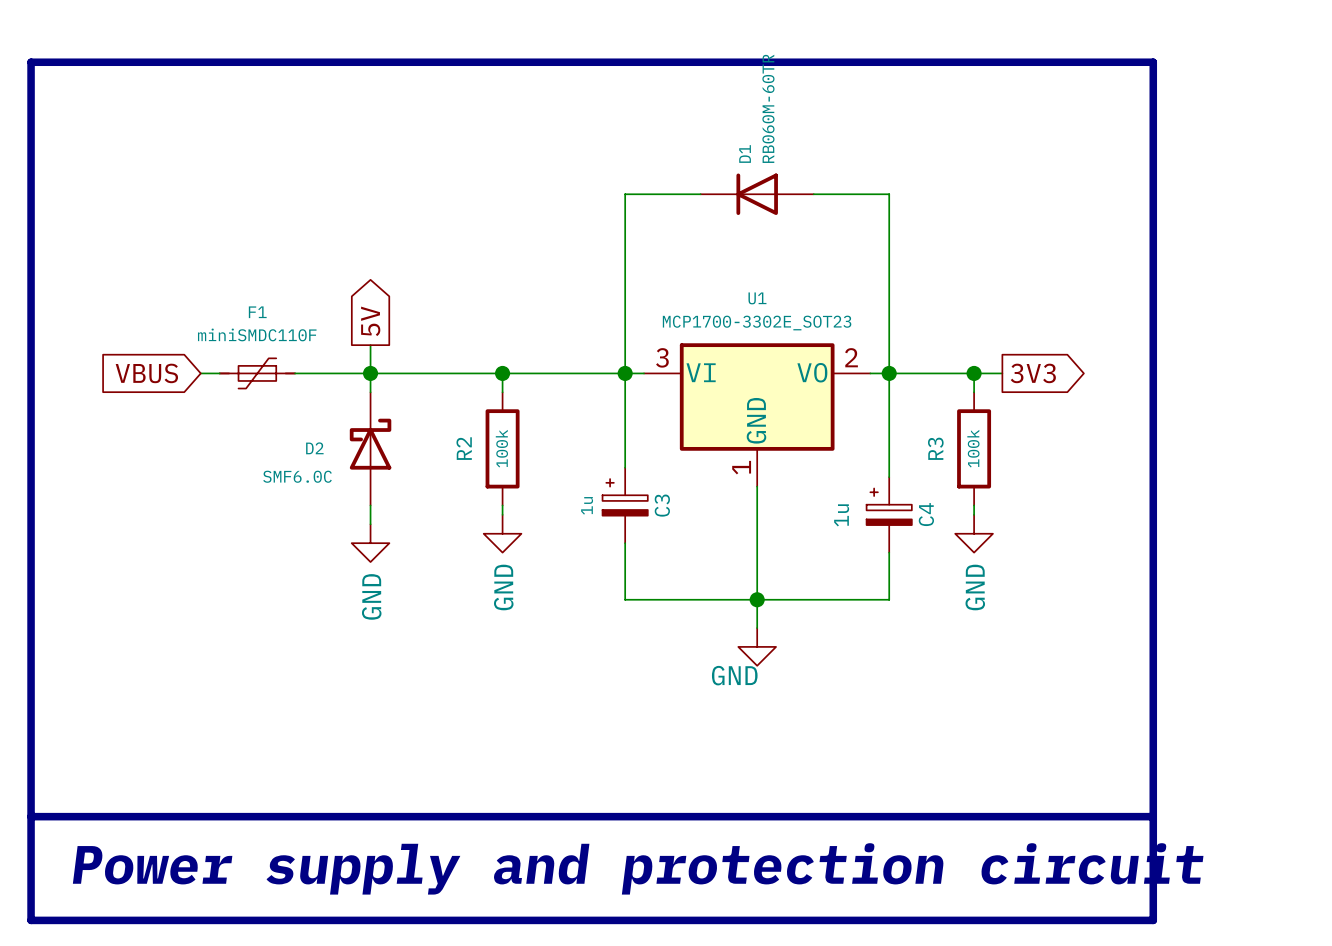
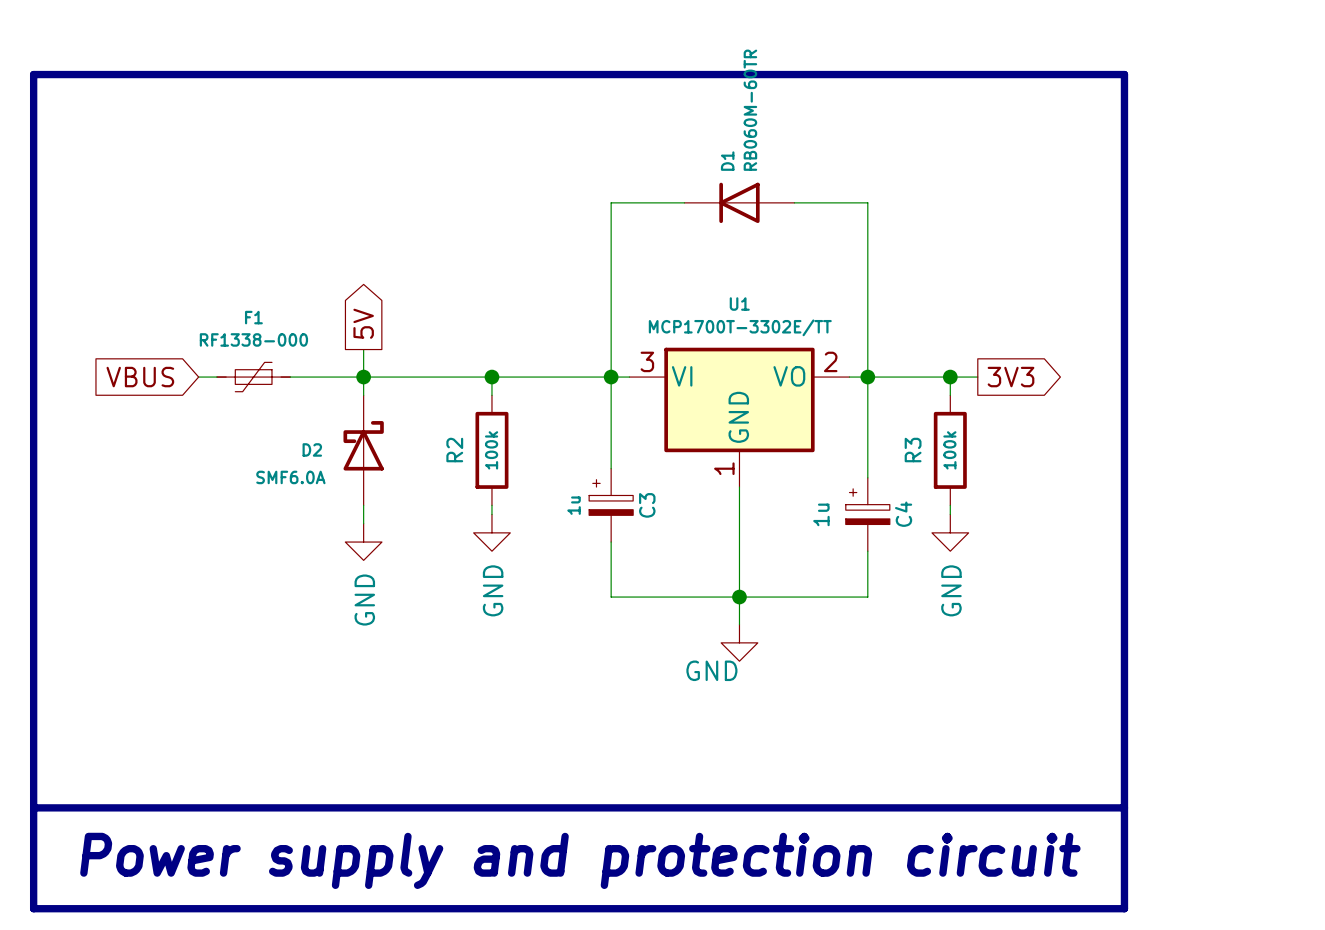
U1 value: MCP1700-3302E_SOT23 (757, 323) -> MCP1700T-3302E/TT (740, 327)
F1 value: miniSMDC110F (257, 334) -> RF1338-000 (253, 339)
D2 value: SMF6.0C (297, 476) -> SMF6.0A (290, 477)

